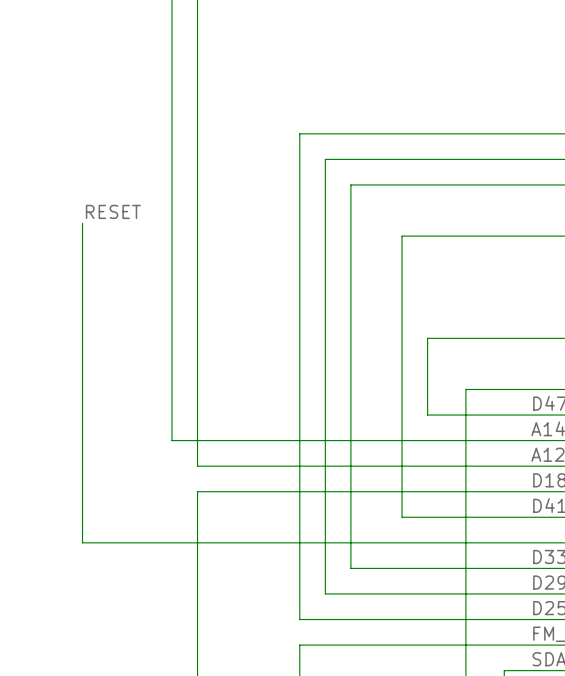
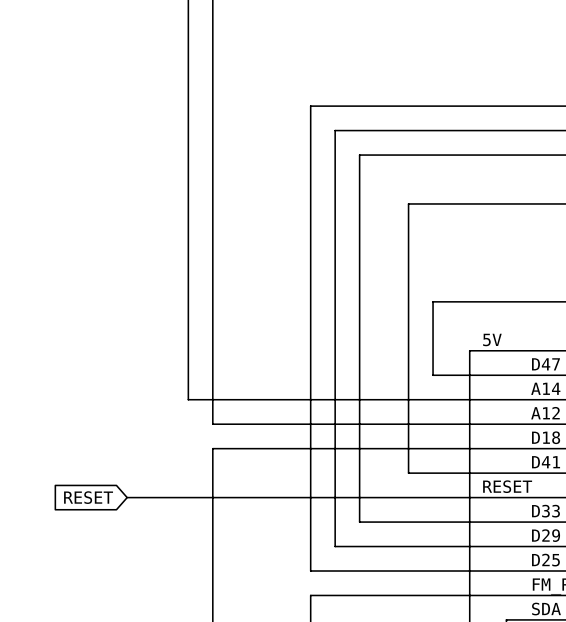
label: RESET (113, 211) -> none
wire: (82, 223) (82, 542) (108, 542) -> none
label: none -> 5V (492, 339)
label: none -> RESET (507, 486)
global label: none -> RESET (88, 497)

